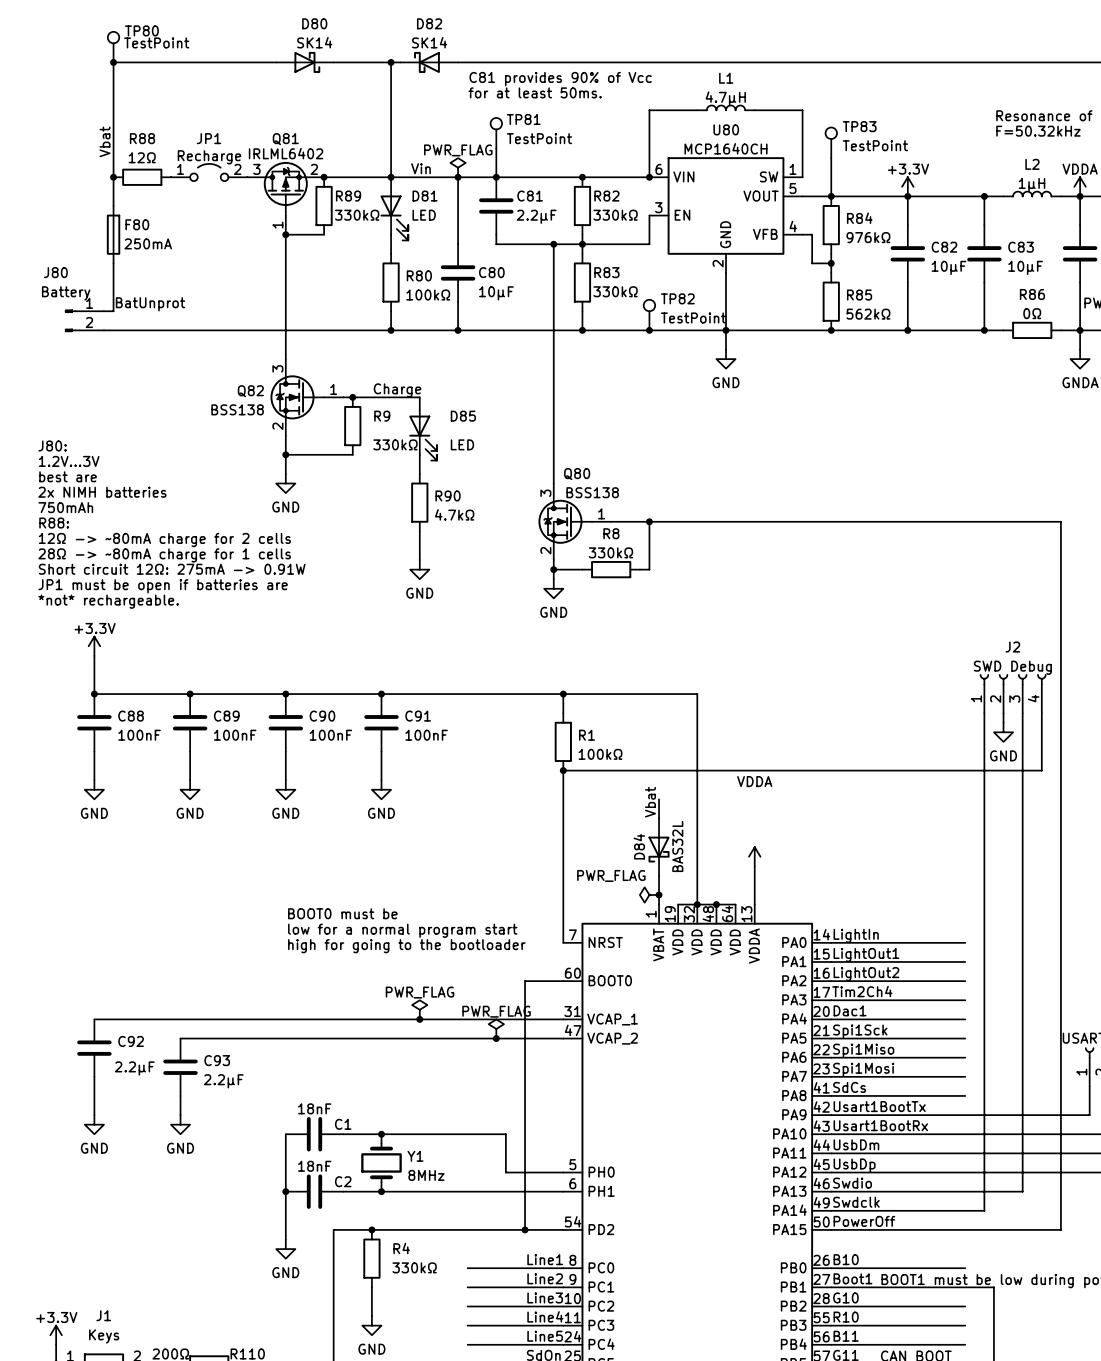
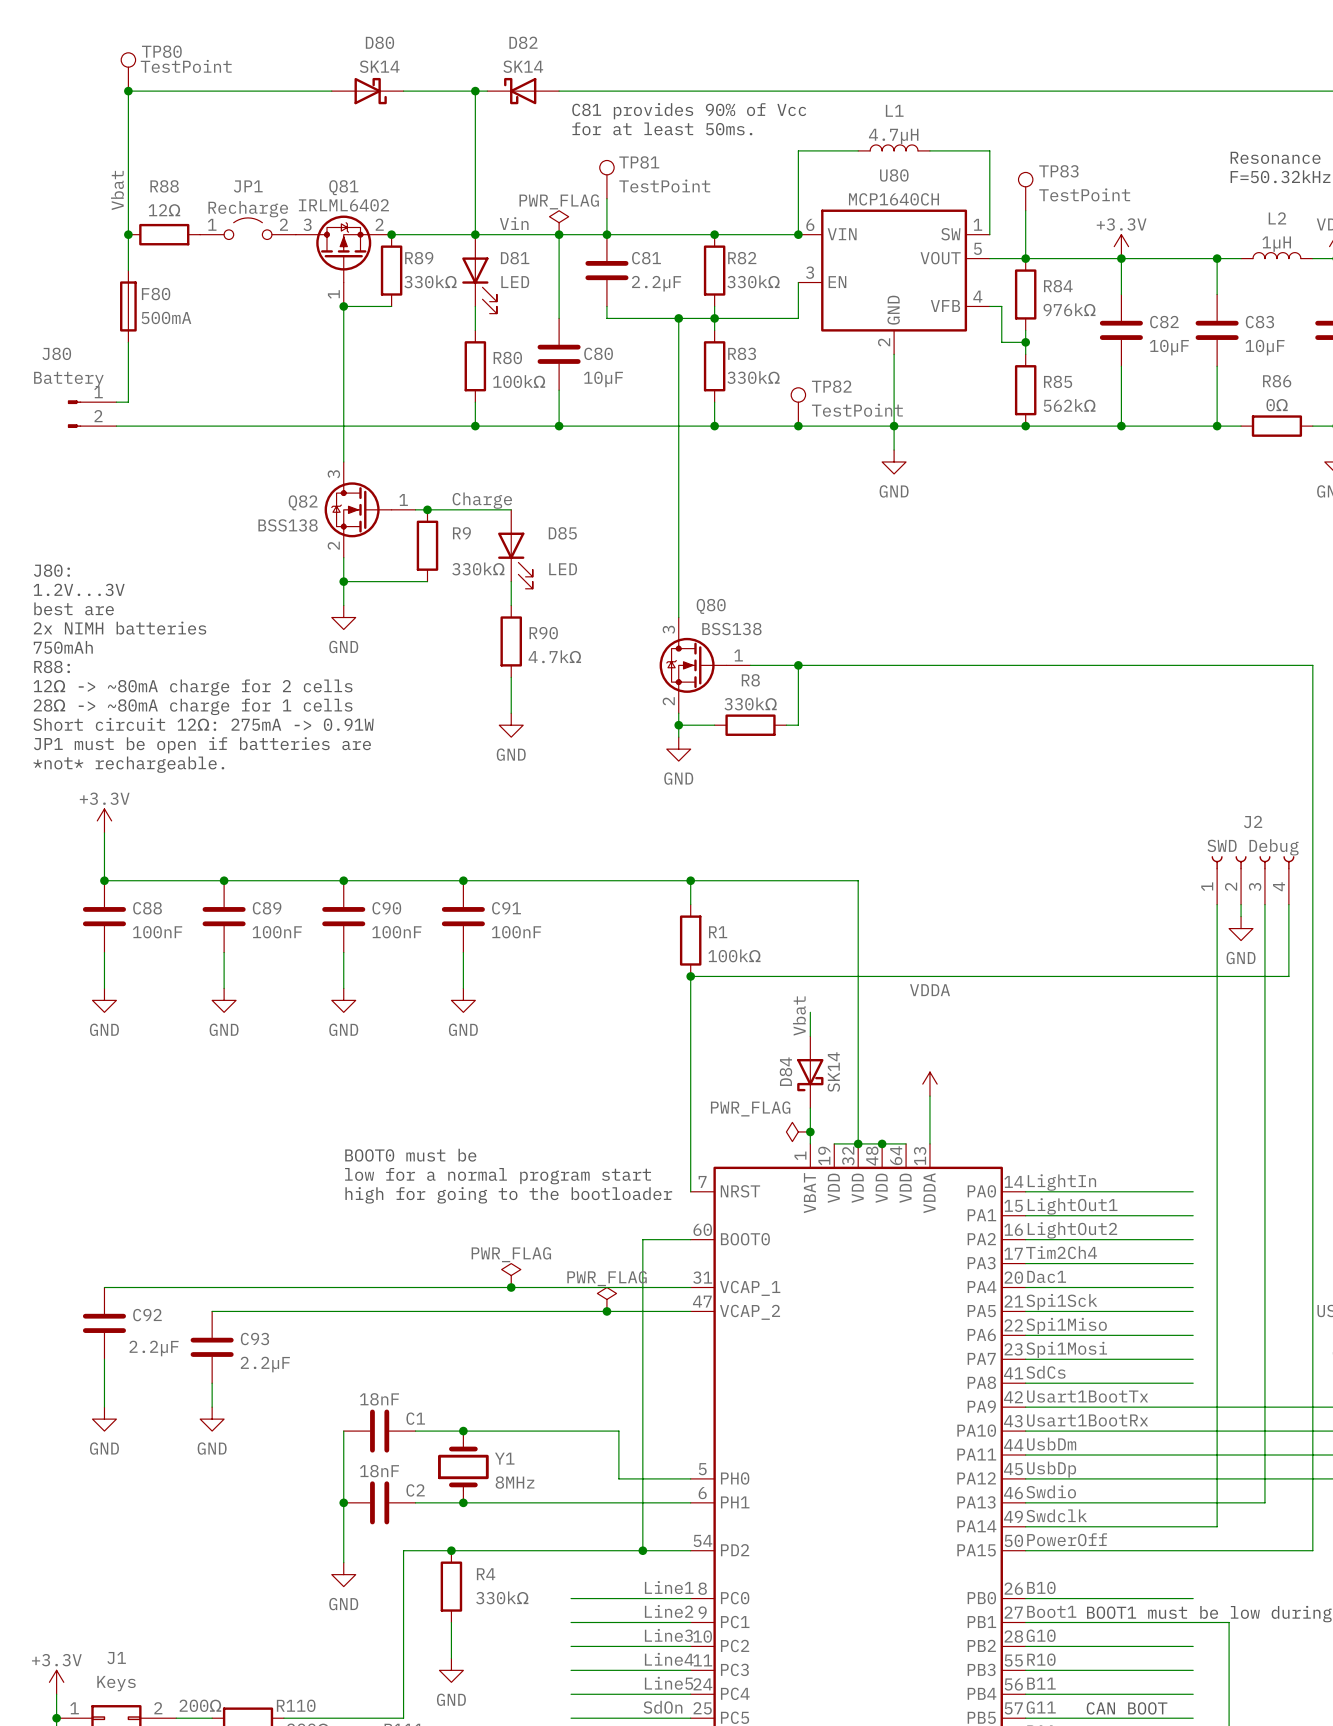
F80 value: 250mA (148, 243) -> 500mA (166, 317)
label: BatUnprot (150, 304) -> none
D84 value: BAS32L (677, 846) -> SK14 (833, 1072)

